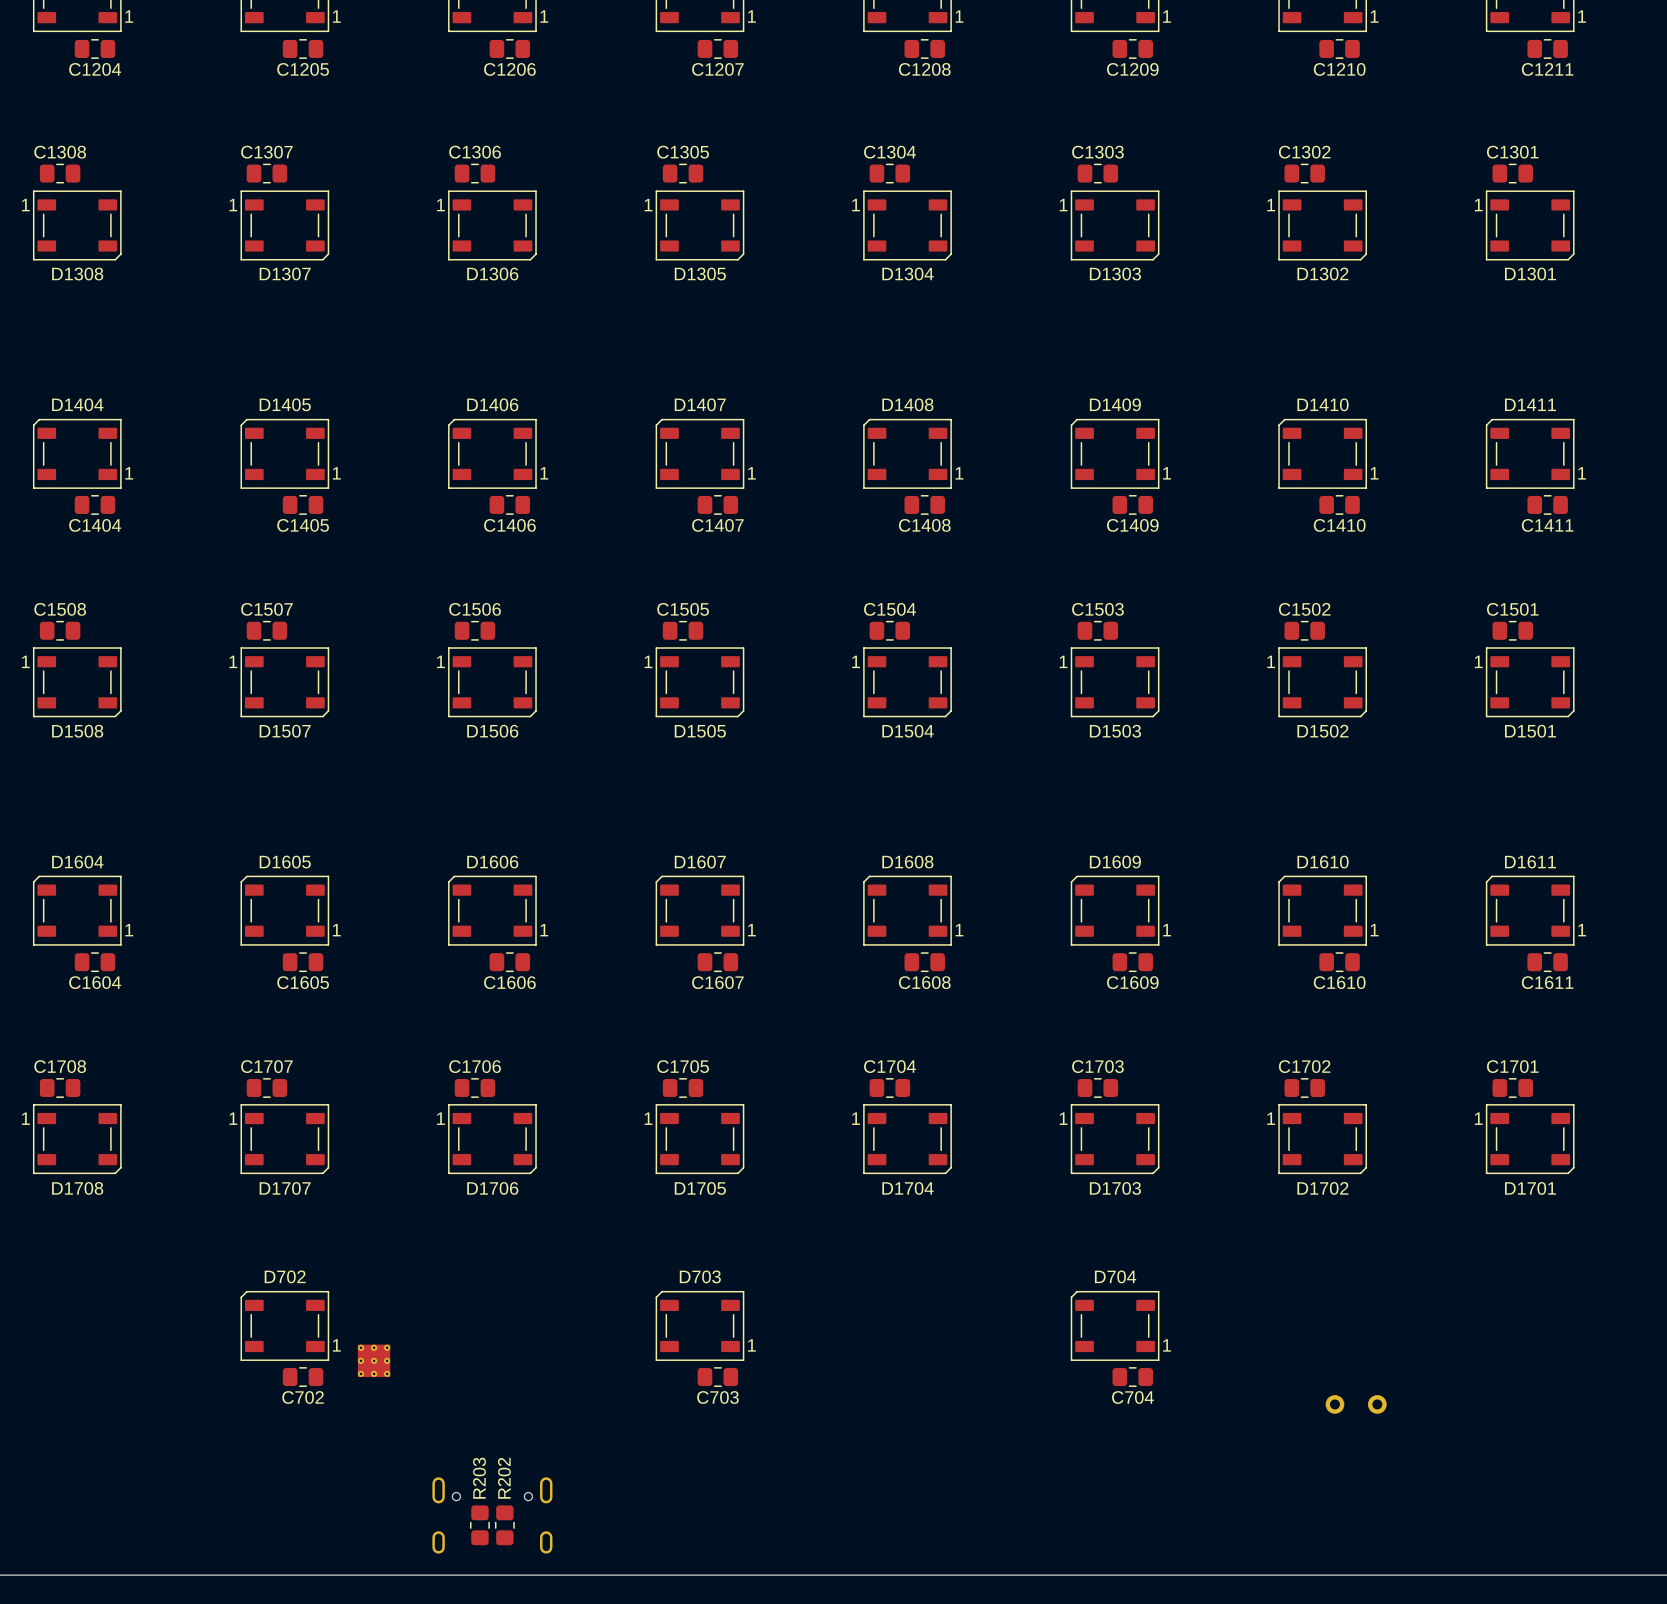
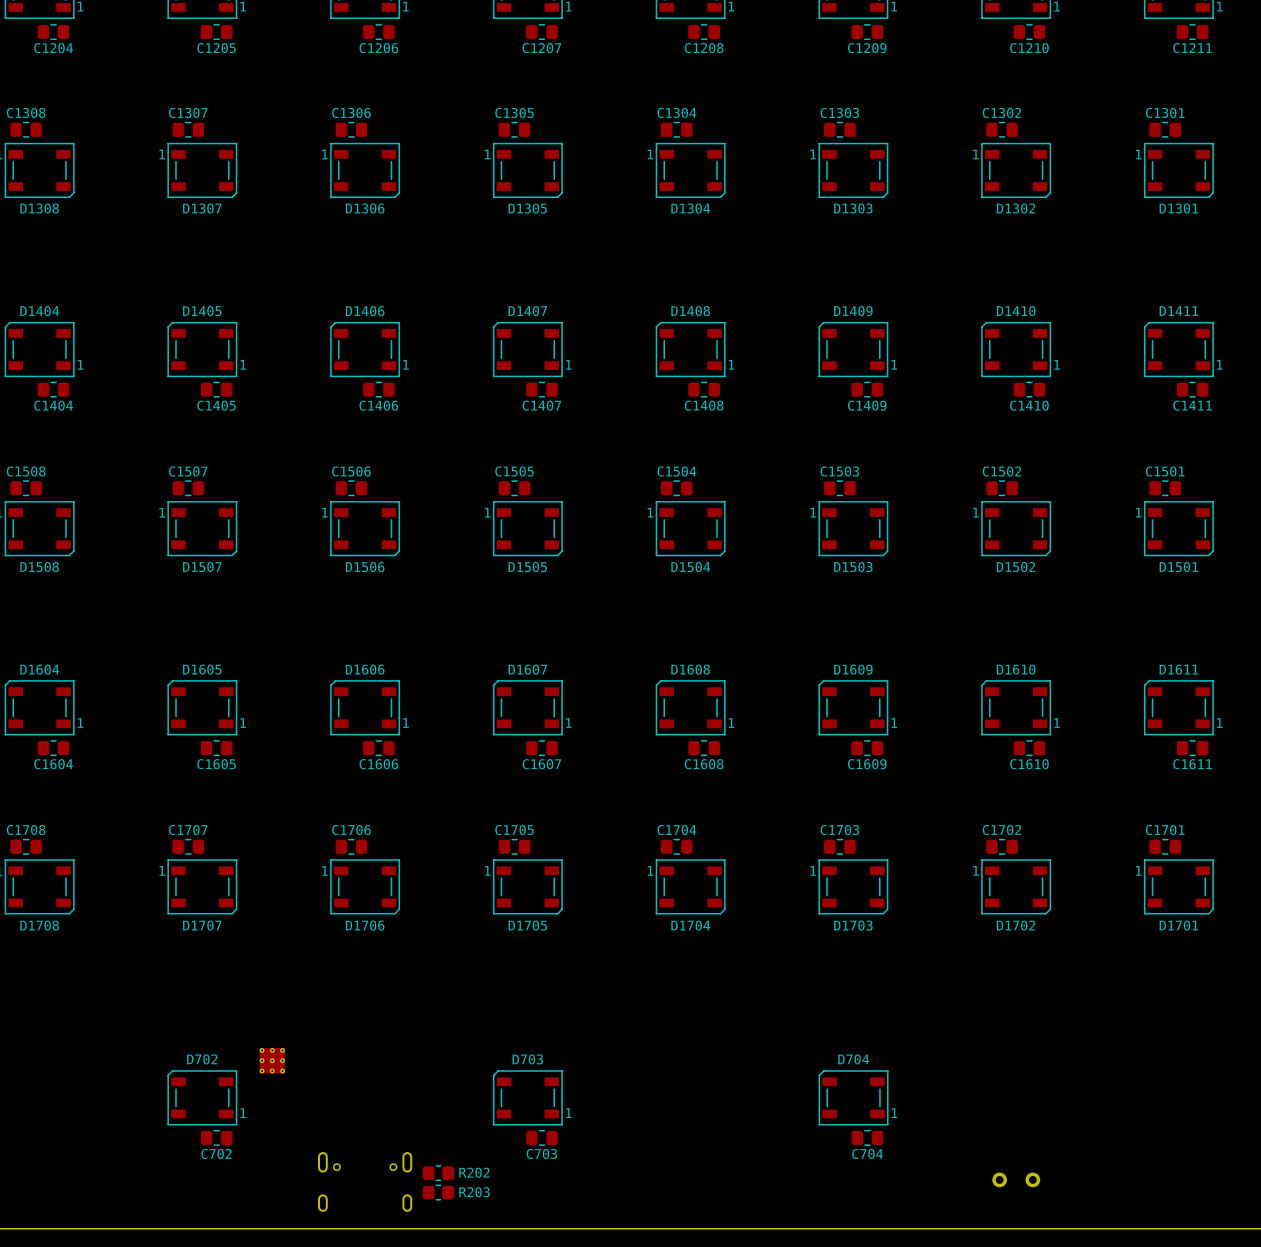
D702 position: (284, 1325) -> (202, 1097)
D703 position: (699, 1325) -> (527, 1097)
D704 position: (1115, 1325) -> (853, 1097)
C702 position: (303, 1377) -> (216, 1137)
C703 position: (717, 1377) -> (541, 1137)
C704 position: (1132, 1377) -> (867, 1137)
part position: (1356, 1404) -> (1016, 1179)
R203 rotation: 0° (479, 1525) -> 90° clockwise (438, 1192)
R203 position: (479, 1525) -> (438, 1192)
R202 rotation: 0° (504, 1525) -> 90° clockwise (438, 1173)
R202 position: (504, 1525) -> (438, 1173)

